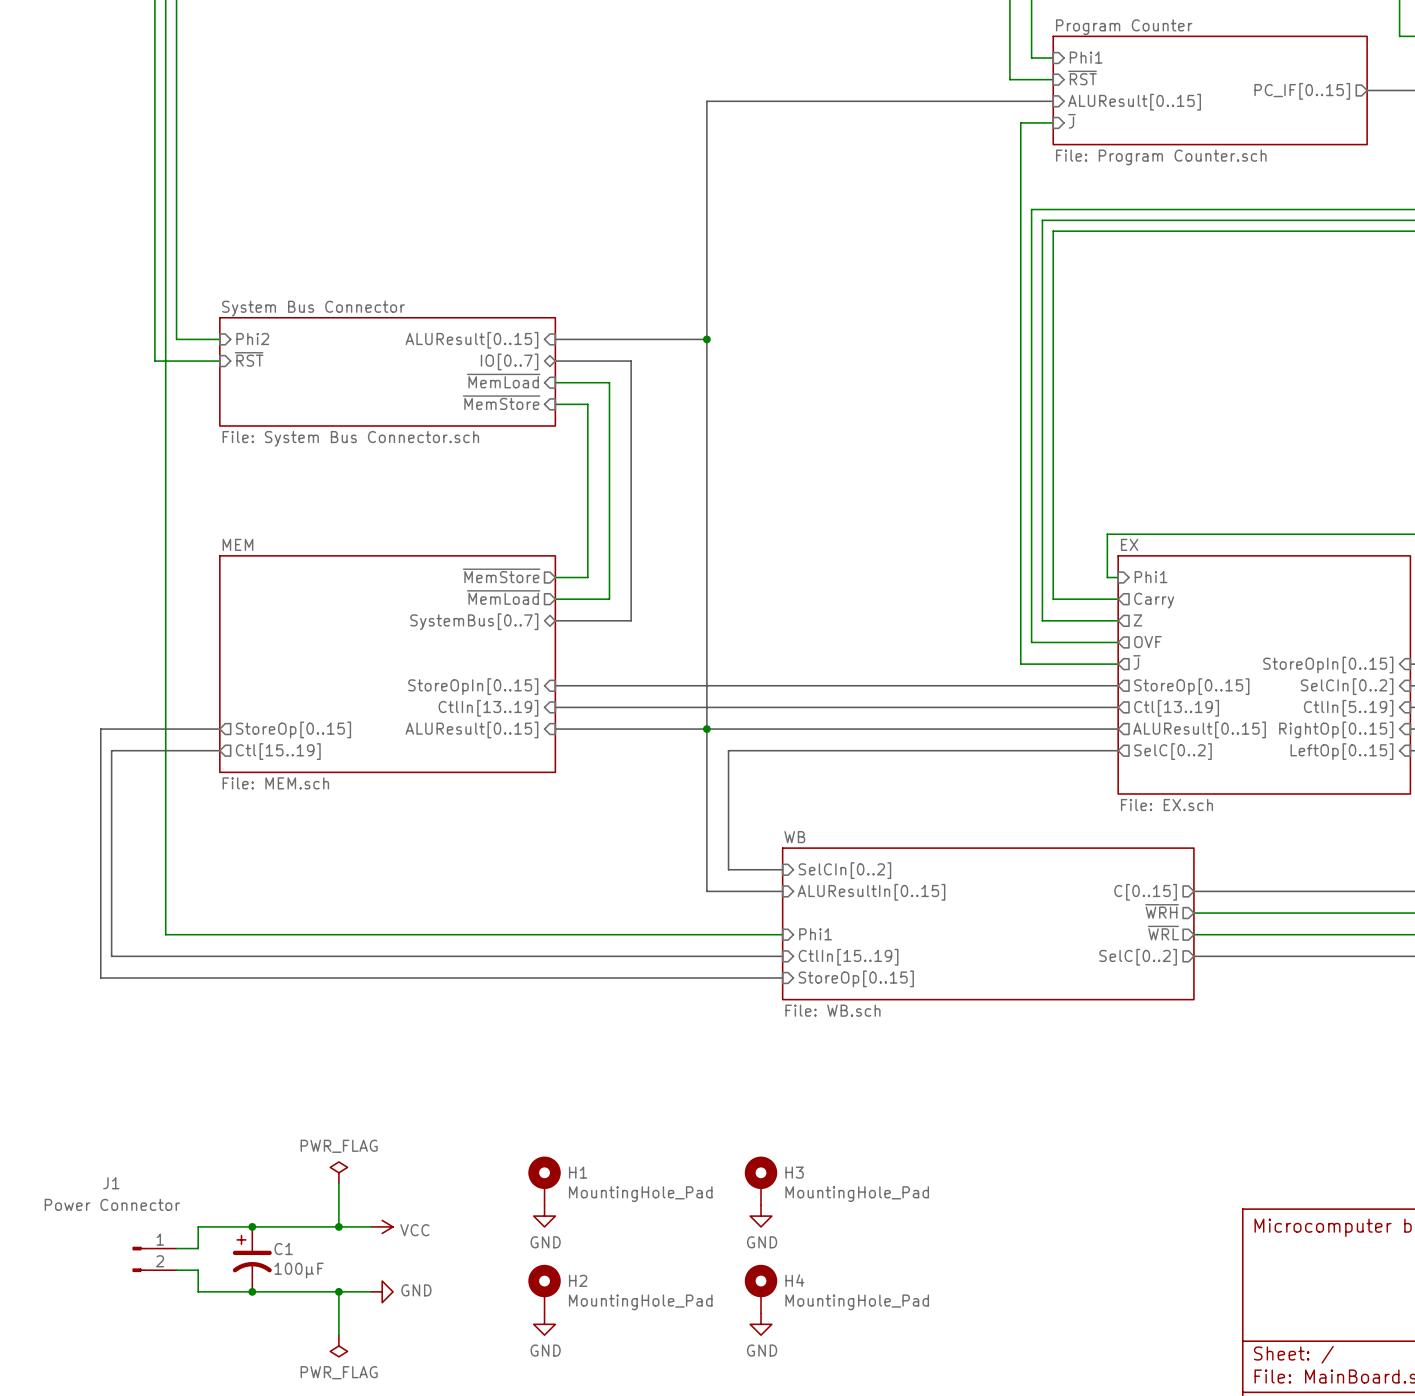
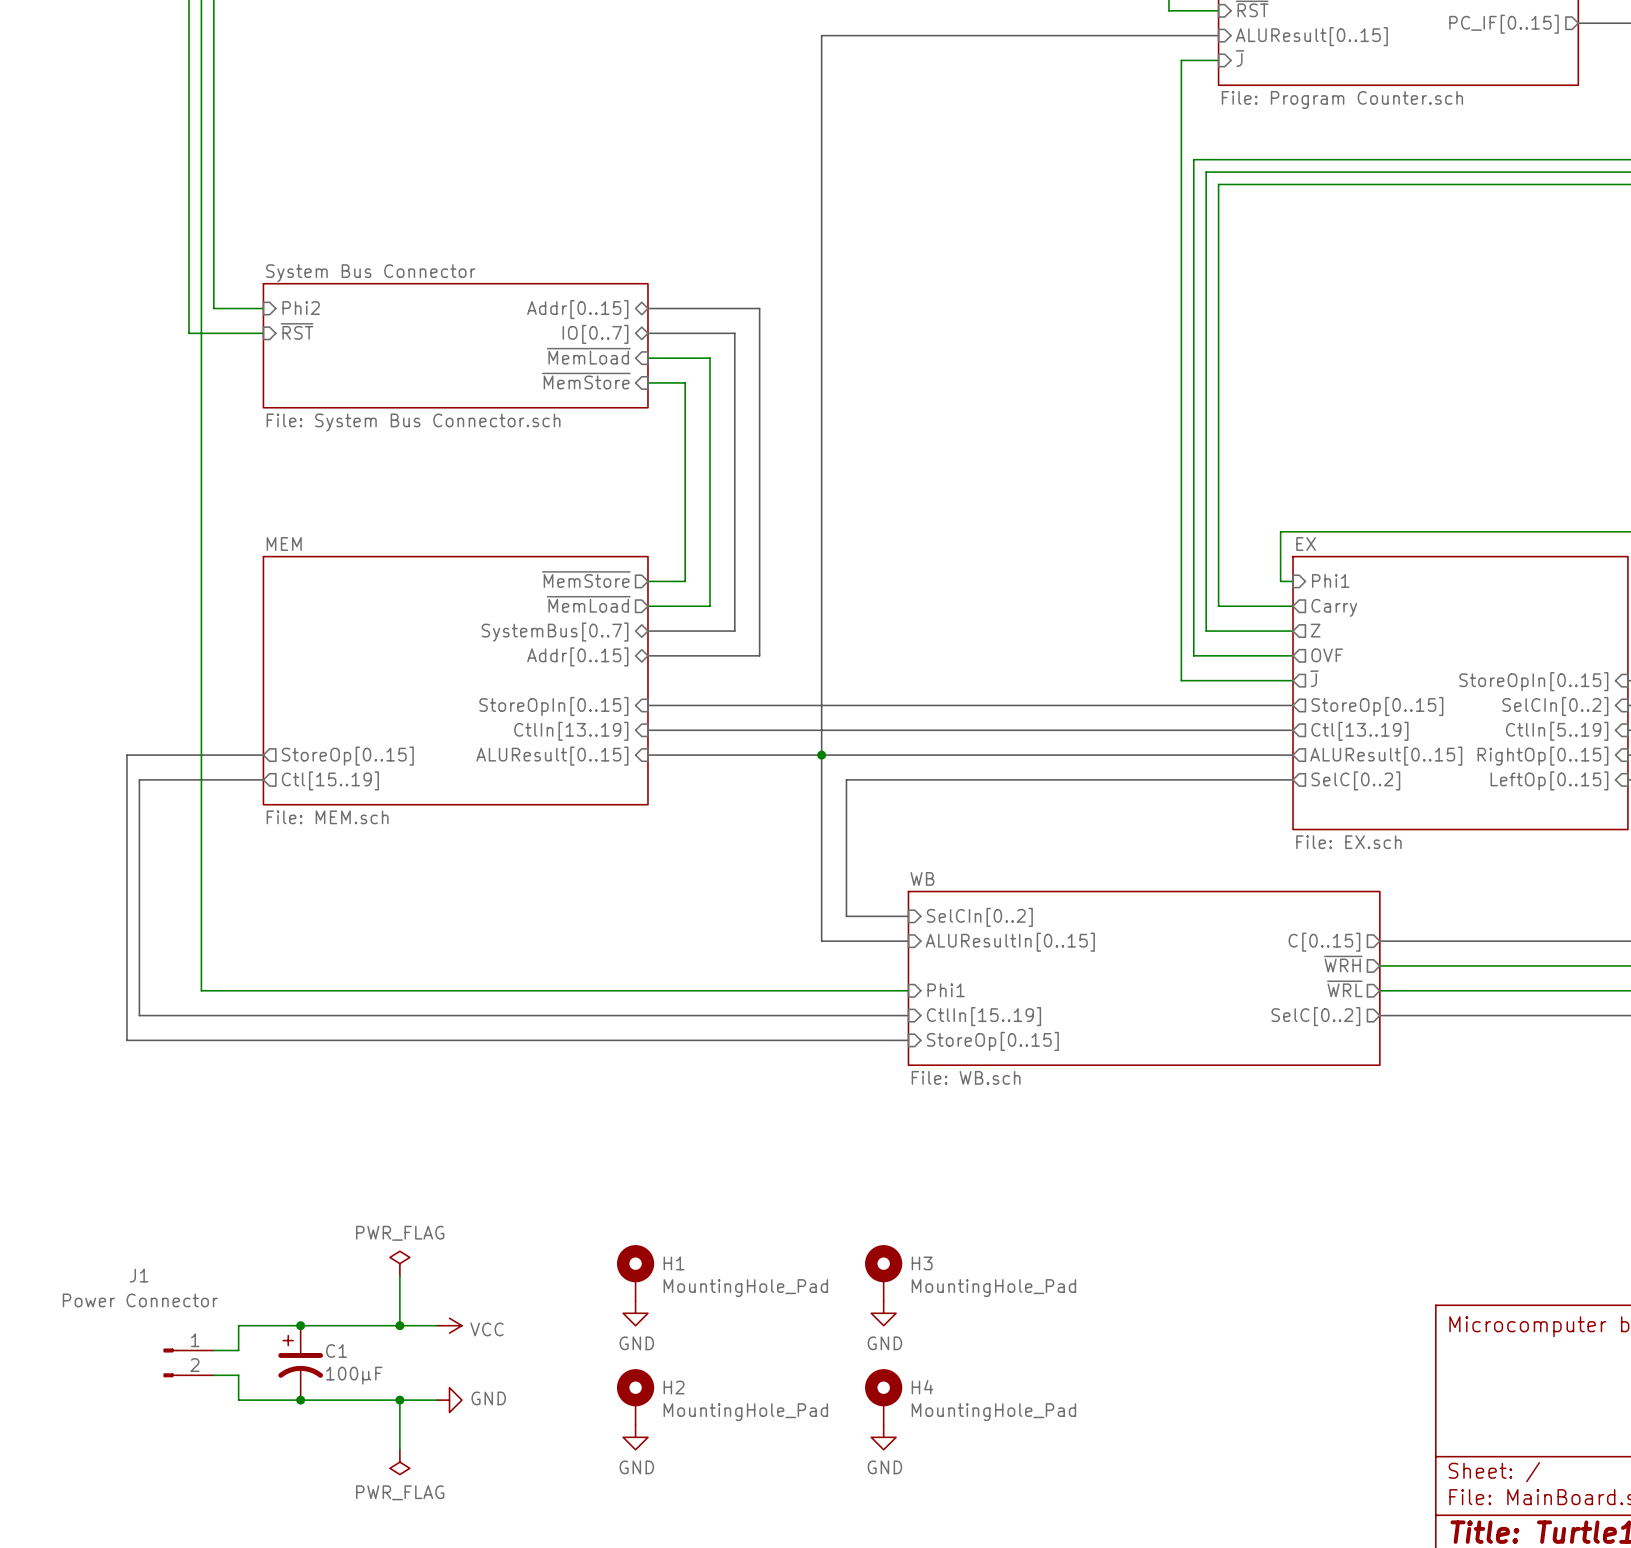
bus: (652, 339) (706, 339) -> (759, 308) (759, 655) (647, 655)
junction: (706, 339) -> none
sheet pin shape: input (471, 340) -> bidirectional (577, 309)
sheet pin: ALUResult[0..15] (471, 340) -> Addr[0..15] (577, 309)
sheet pin: none -> Addr[0..15] (577, 656)

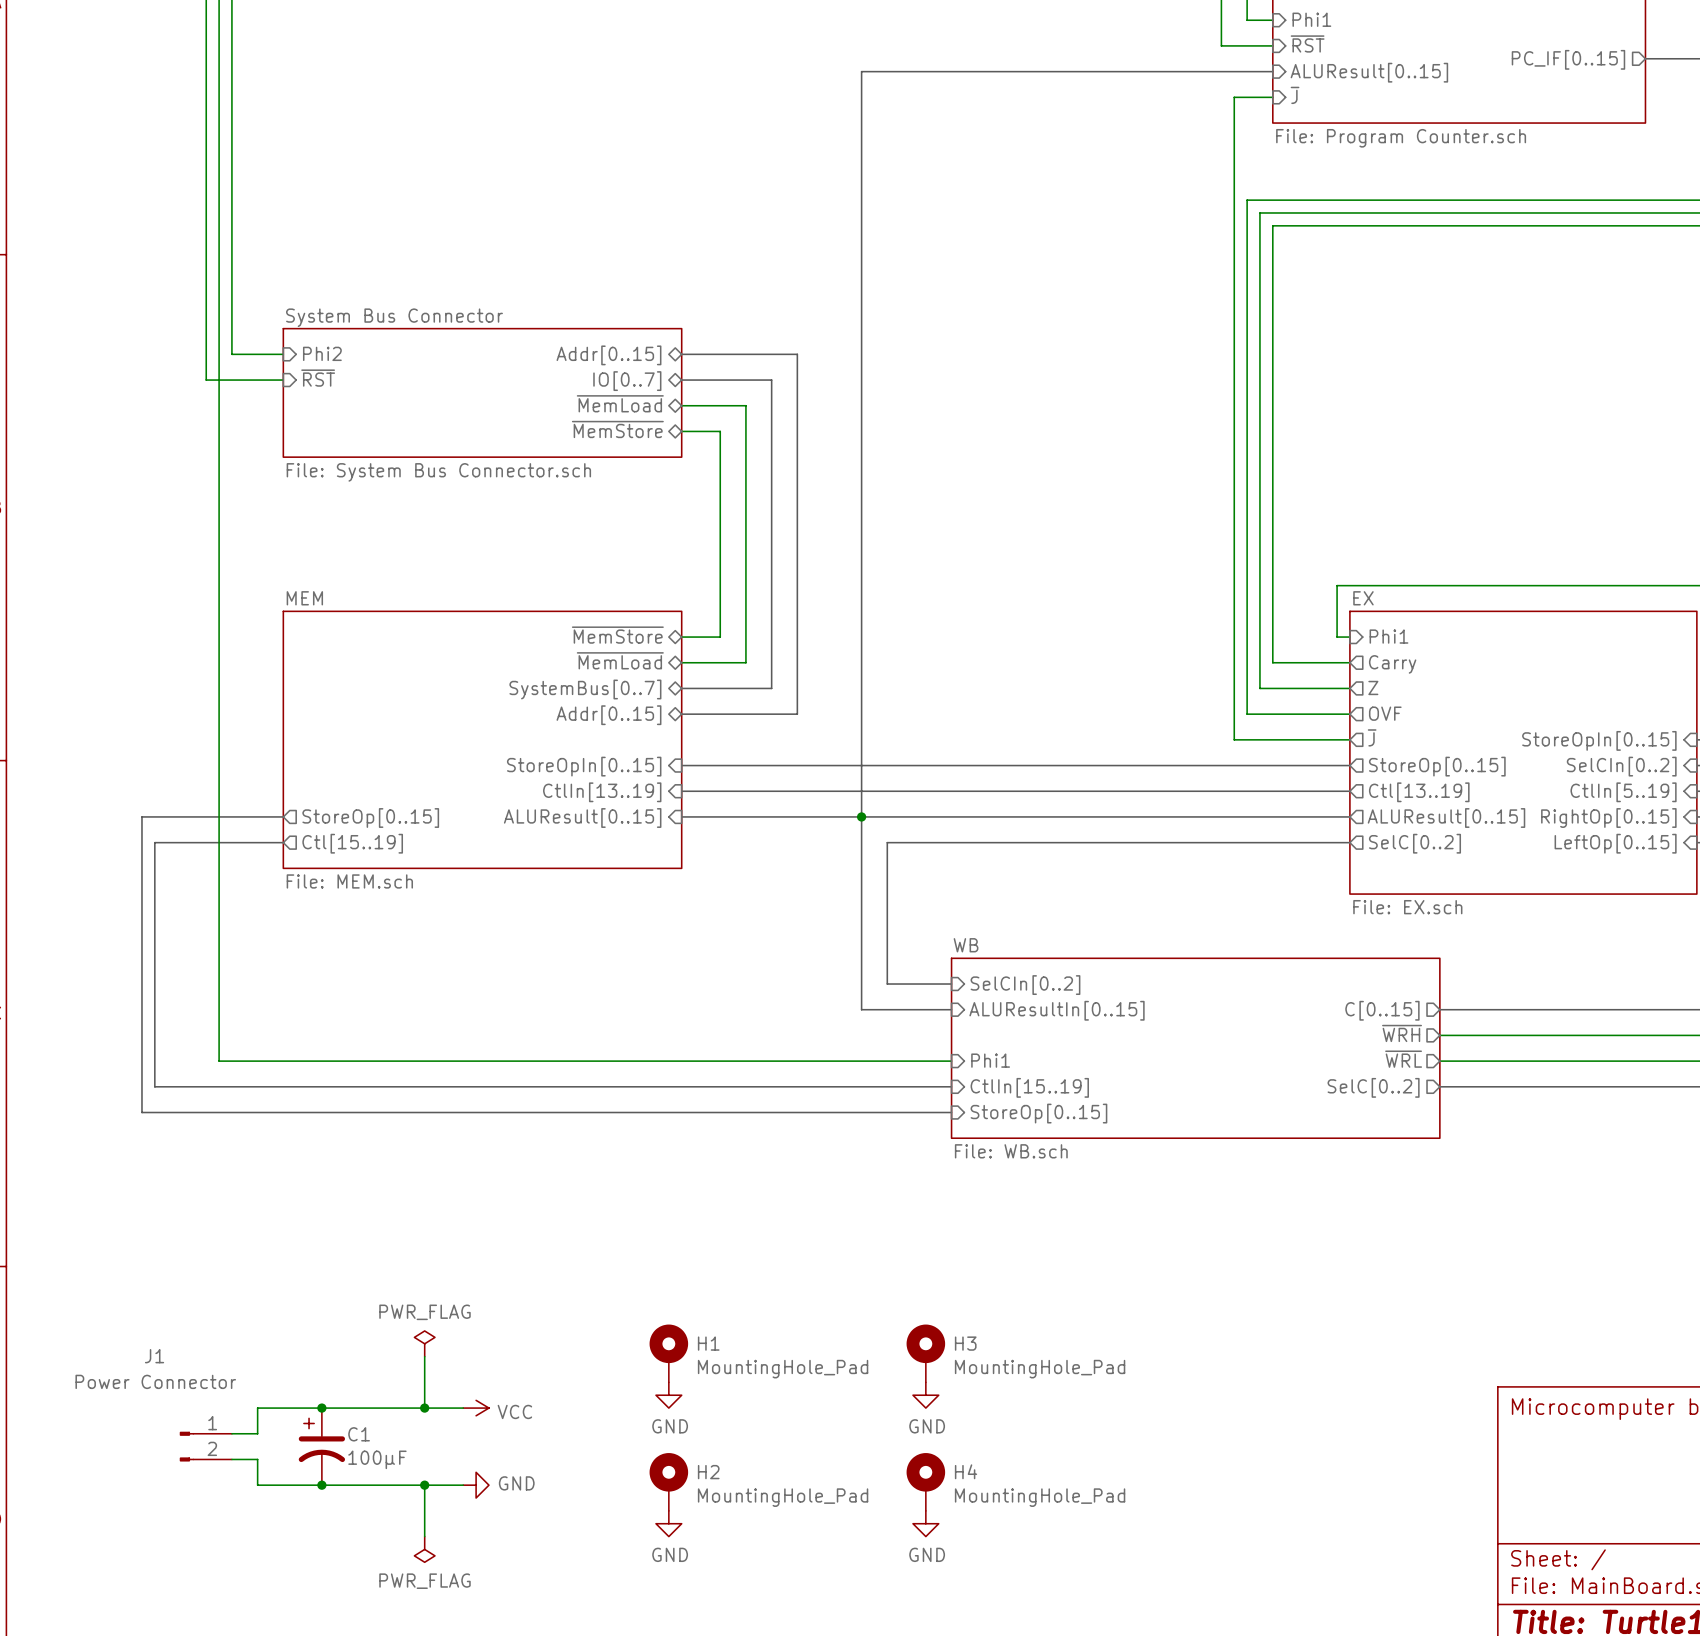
sheet pin shape: input (588, 356) -> bidirectional (620, 403)
sheet pin shape: input (586, 381) -> bidirectional (617, 429)
sheet pin shape: output (586, 579) -> bidirectional (617, 635)
sheet pin shape: output (588, 604) -> bidirectional (620, 660)

